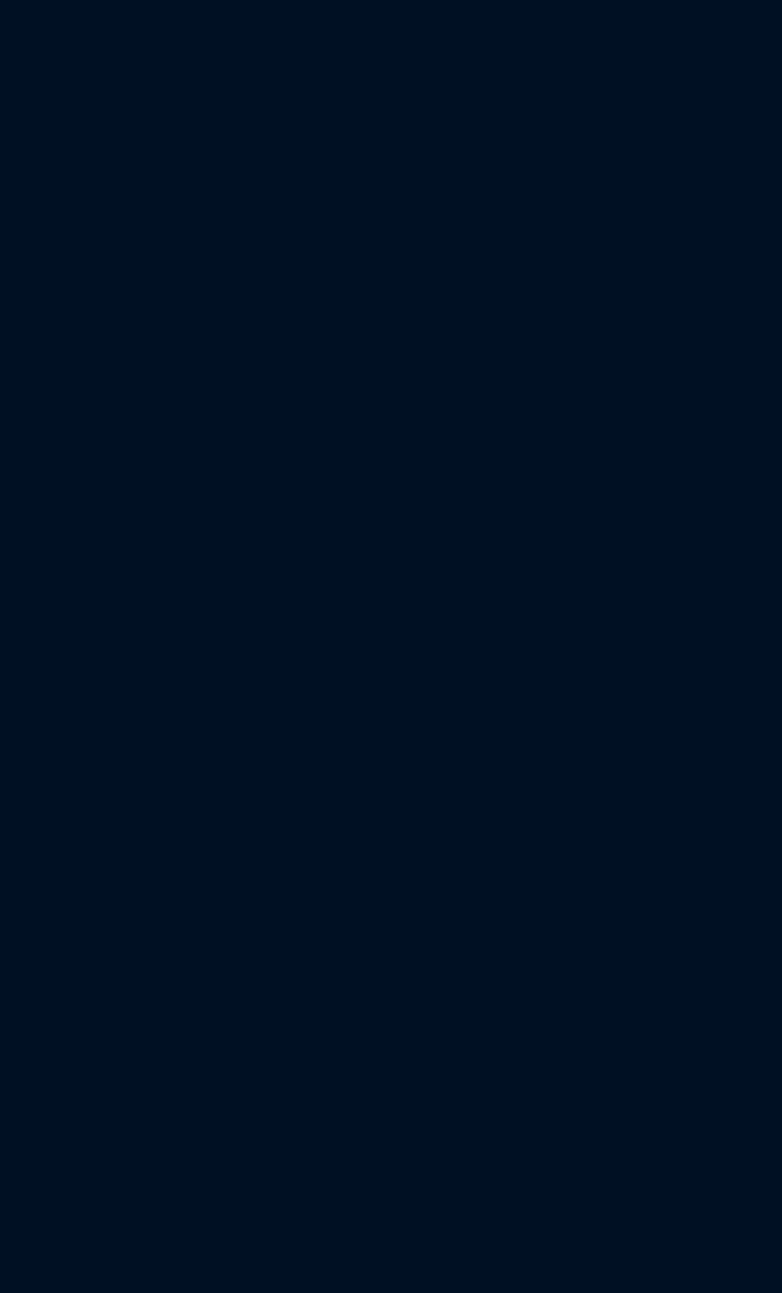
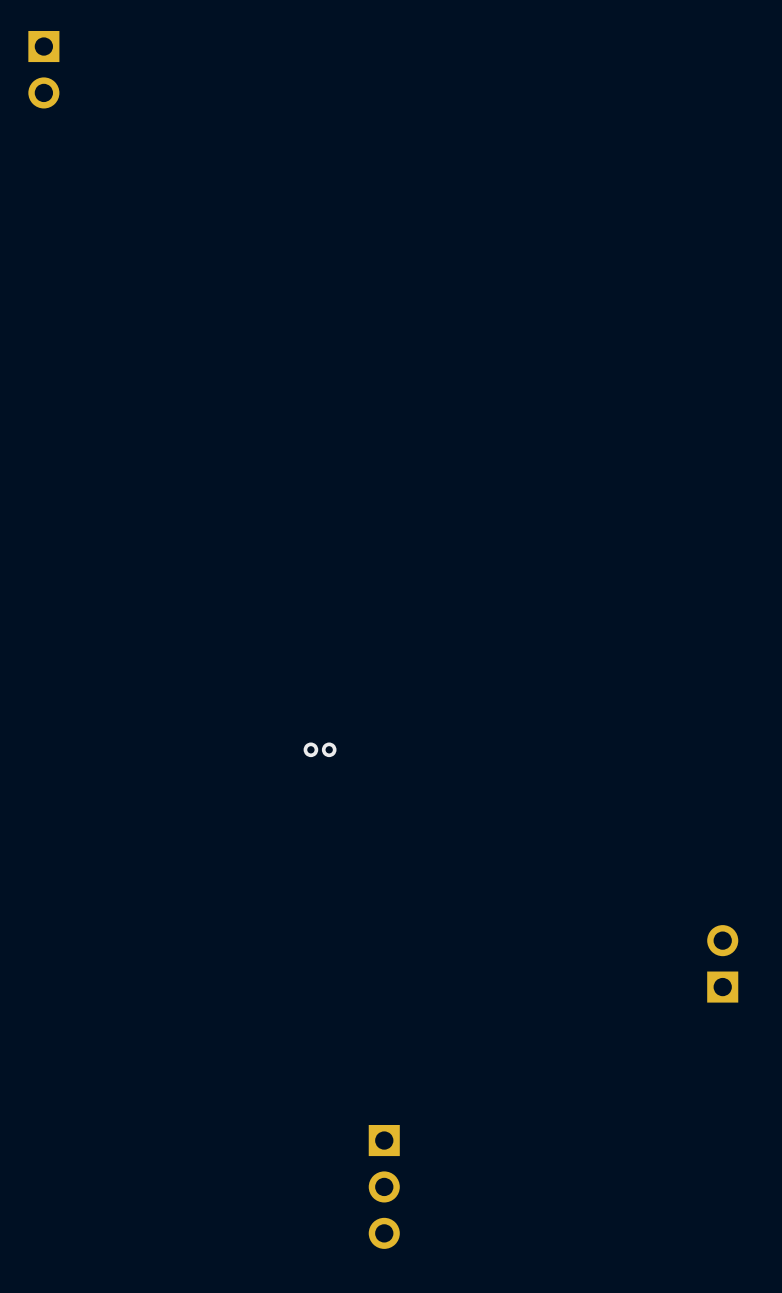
part: none -> (43, 69)
via: none -> (310, 749)
via: none -> (329, 749)
part: none -> (722, 963)
part: none -> (384, 1186)

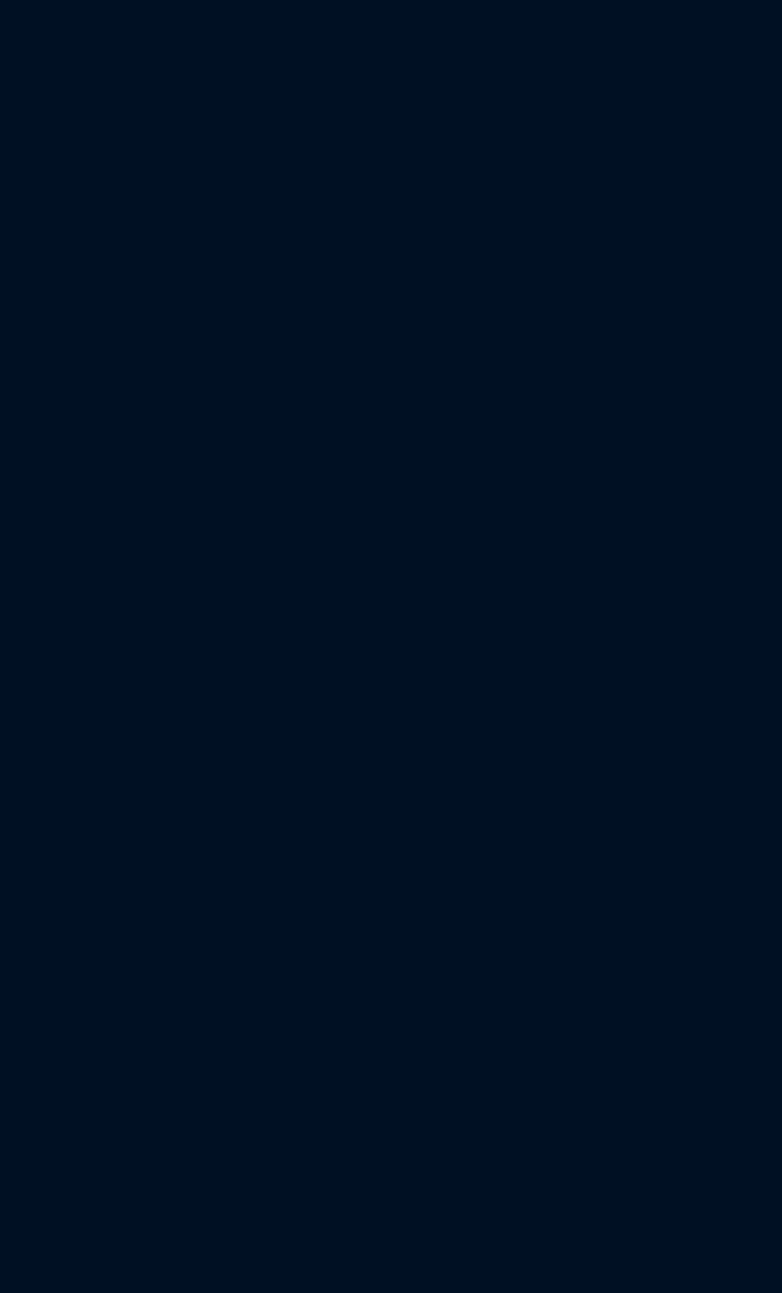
part: (43, 69) -> none
via: (310, 749) -> none
via: (329, 749) -> none
part: (722, 963) -> none
part: (384, 1186) -> none

